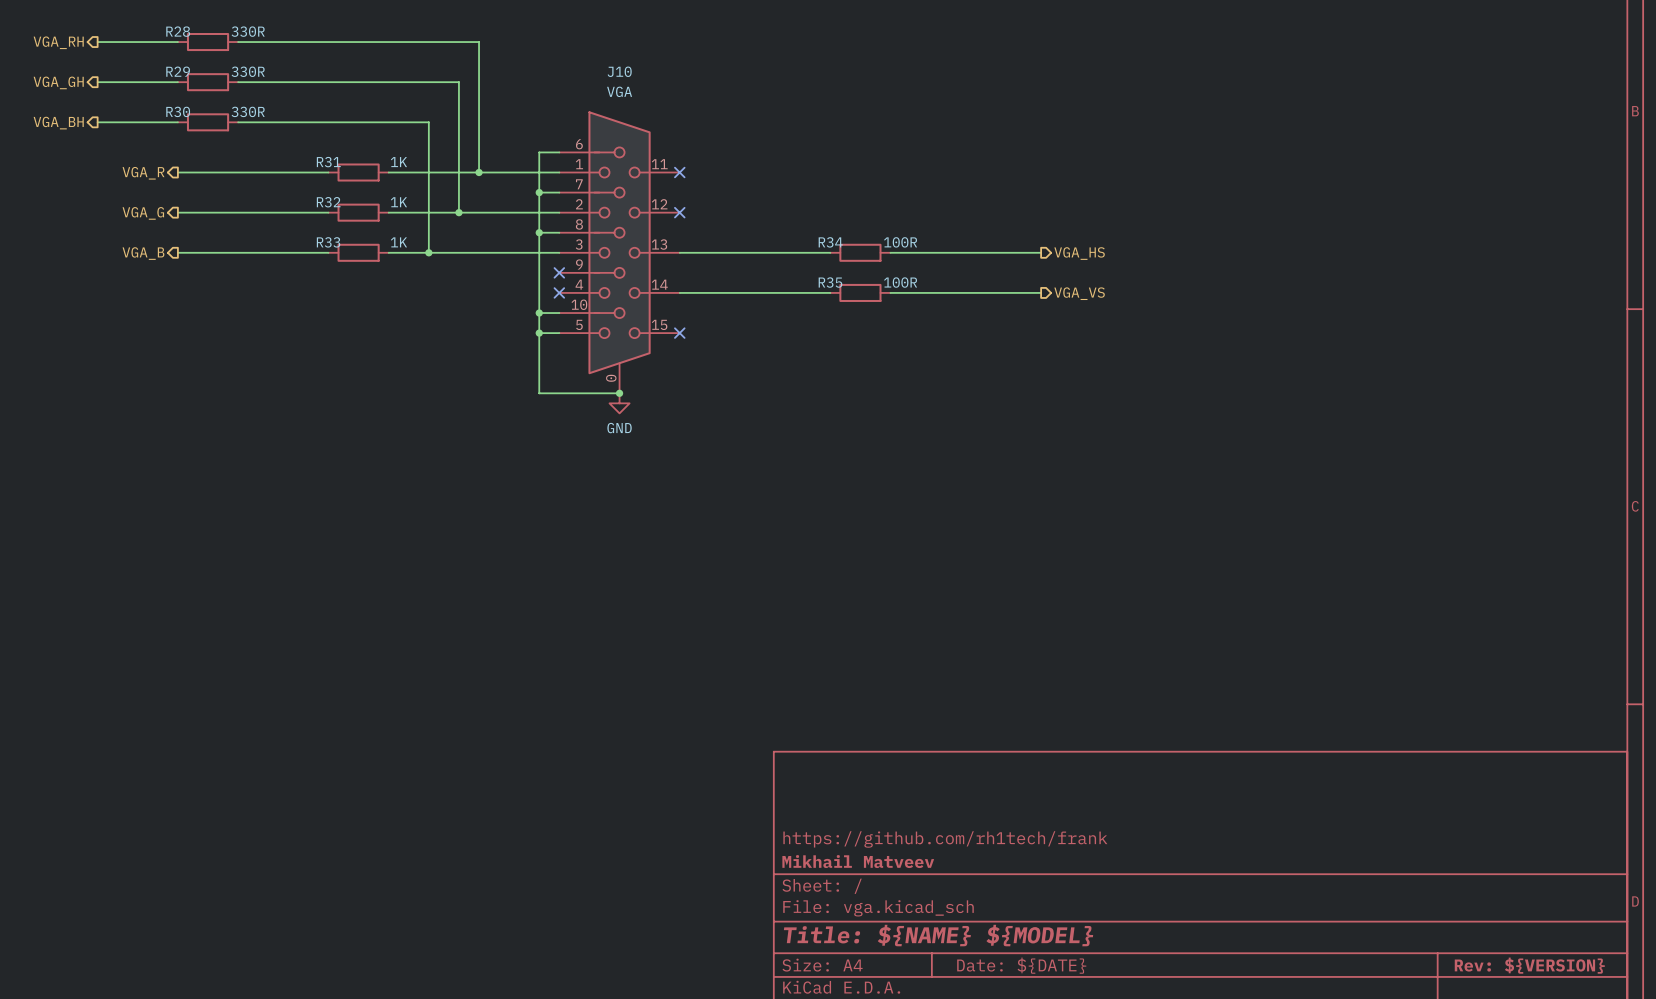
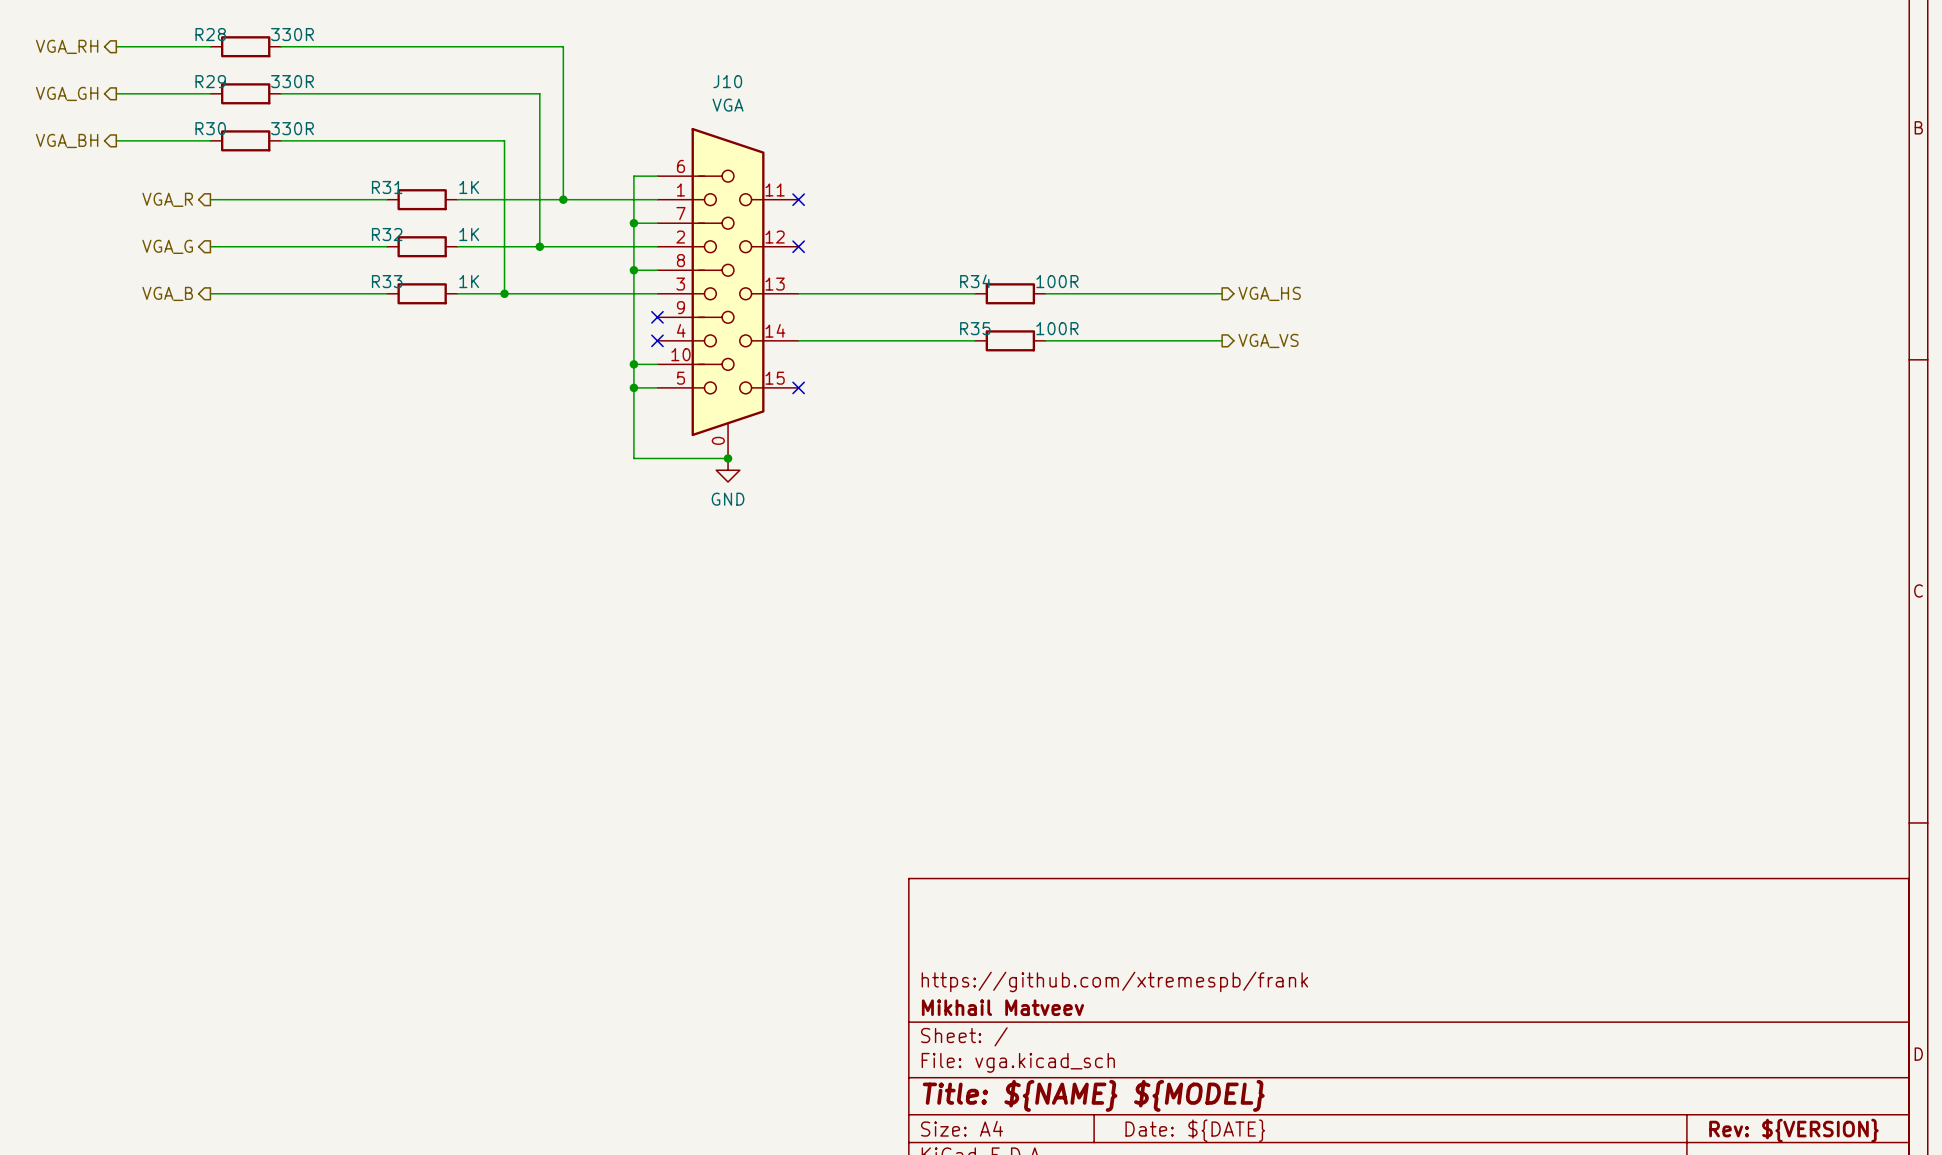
title block: https://github.com/rh1tech/frank (945, 839) -> https://github.com/xtremespb/frank (1114, 981)

